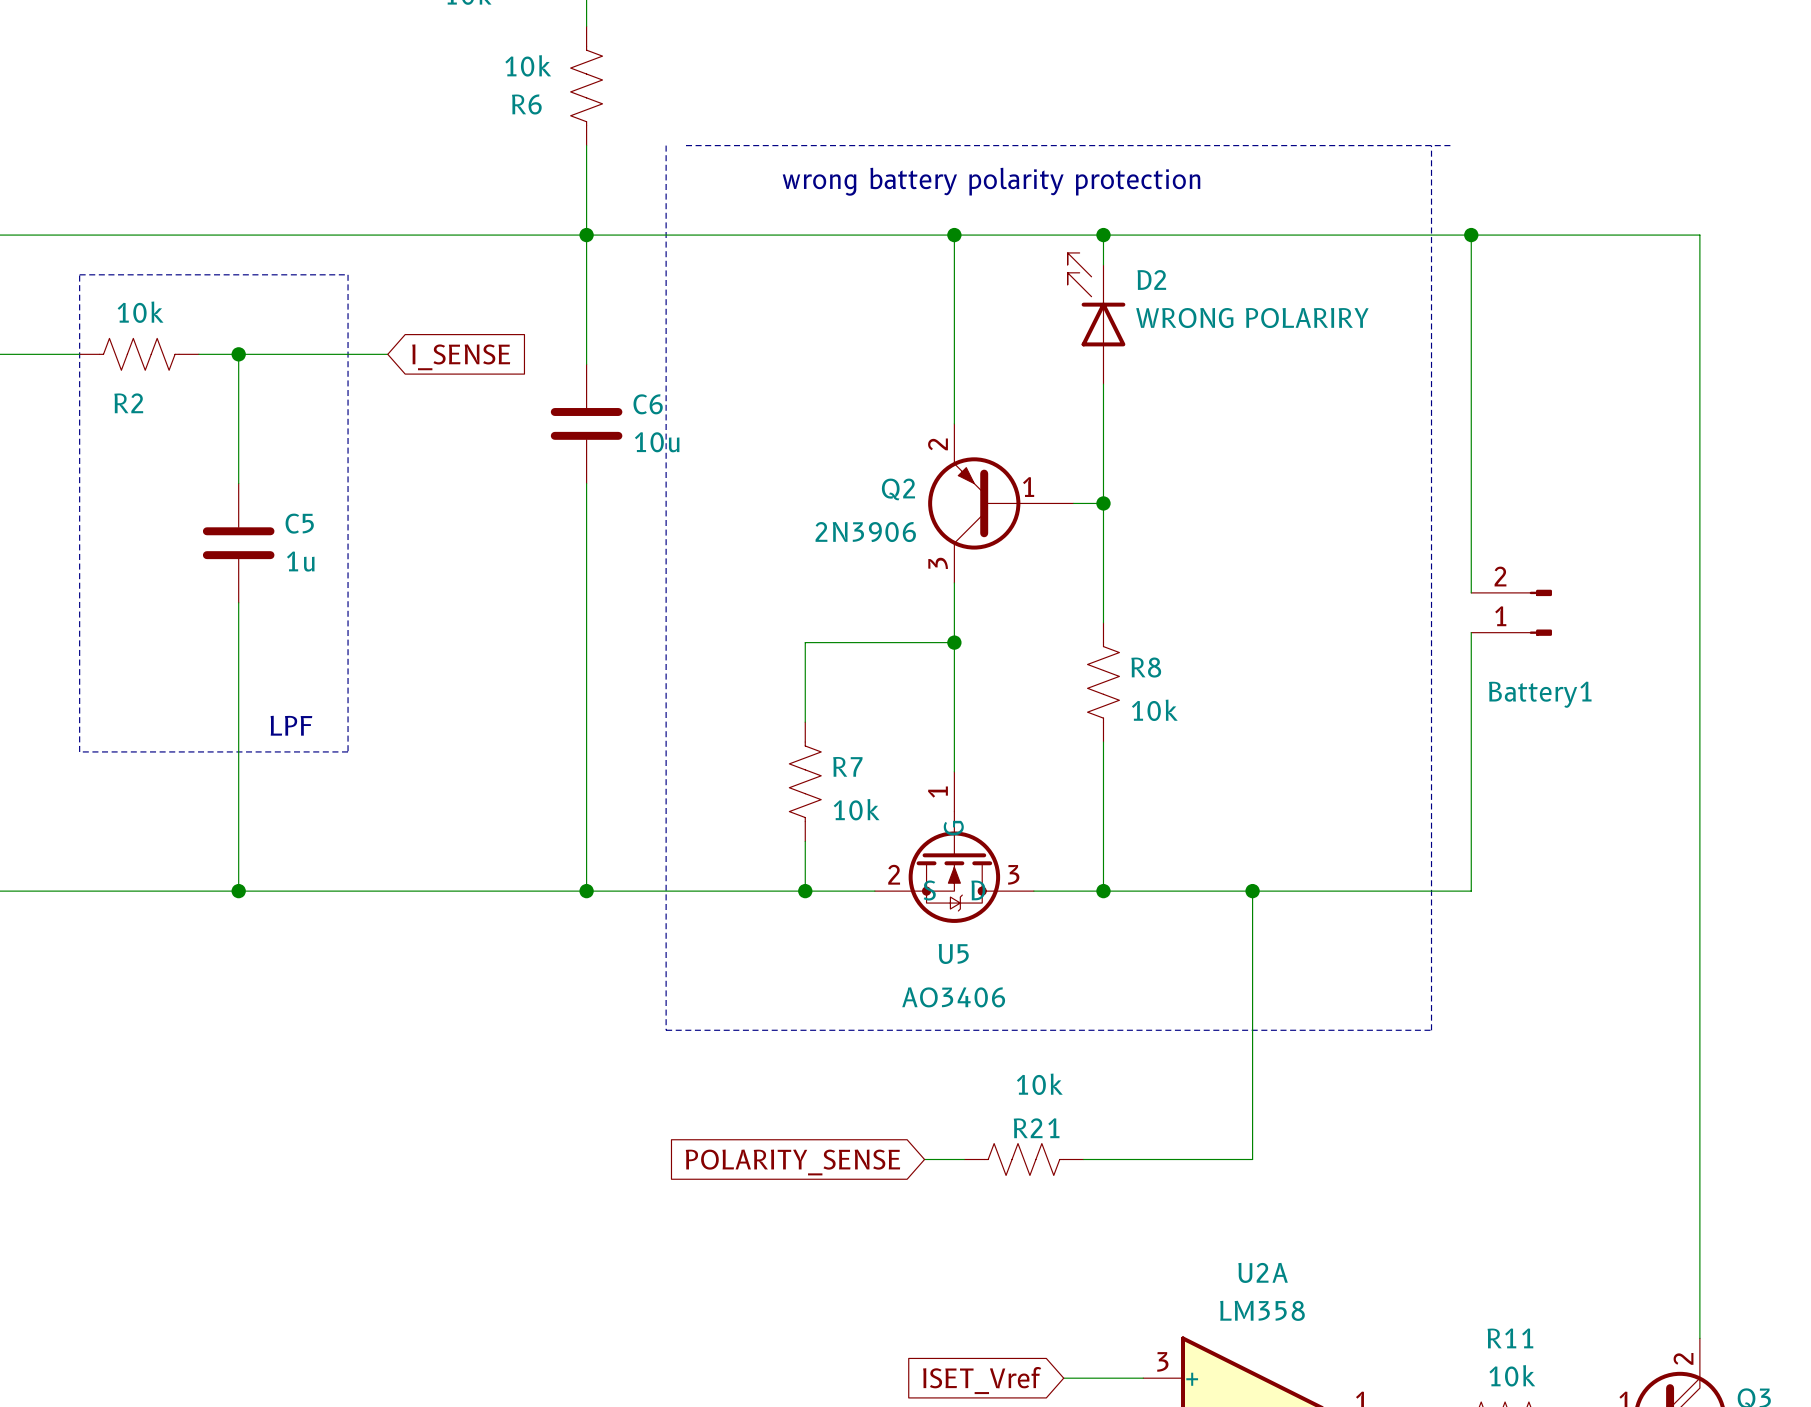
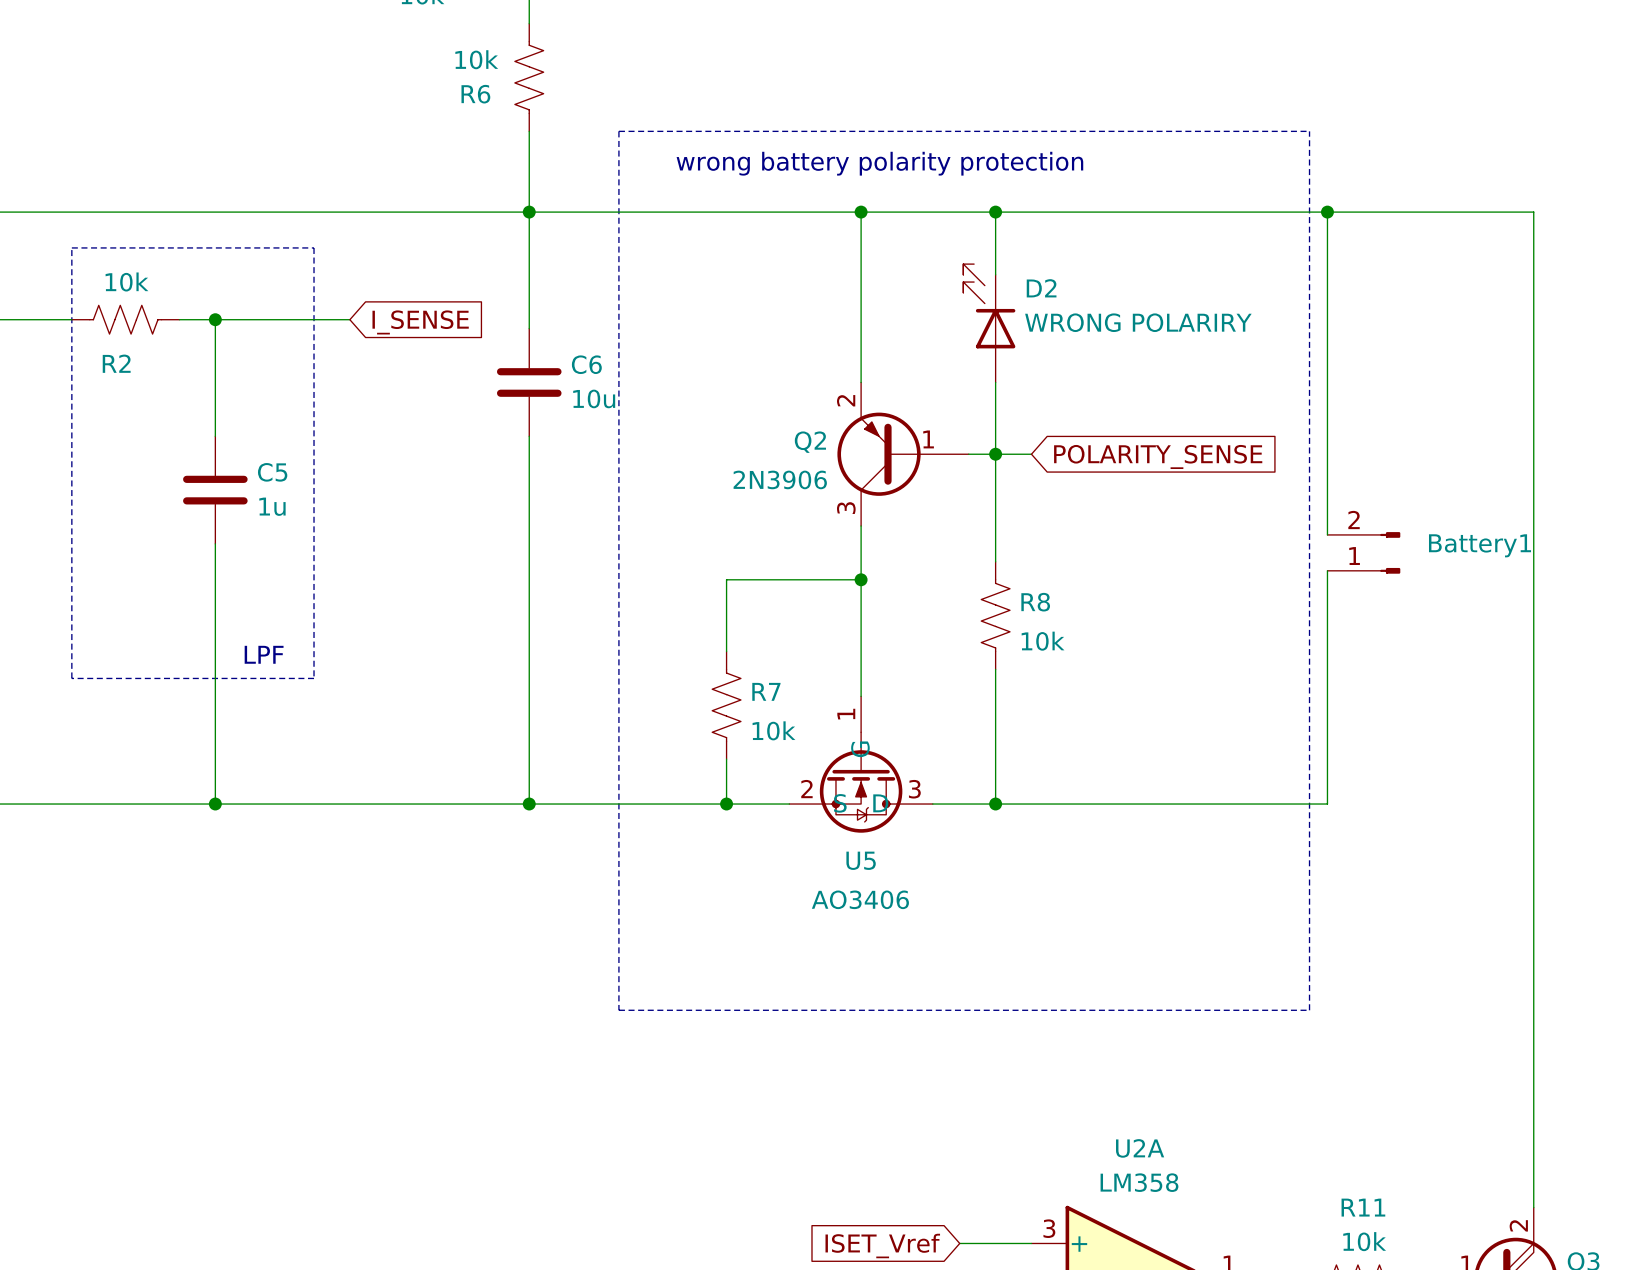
line: (666, 145) (666, 1030) (1431, 1030) (1431, 145) -> none
line: none -> (618, 131) (618, 1010) (1309, 1010) (1309, 131)
D2 position: (1096, 318) -> (989, 323)
wire: none -> (995, 454) (1031, 454)
global label: none -> POLARITY_SENSE (1158, 456)
Battery1 name position: Battery1 (1540, 694) -> Battery1 (1480, 545)
wire: (1252, 891) (1252, 1159) (1083, 1159) -> none
junction: (1252, 891) -> none
wire: (924, 1159) (964, 1159) -> none
R21: 10k (1023, 1159) -> none
global label: POLARITY_SENSE (792, 1162) -> none

